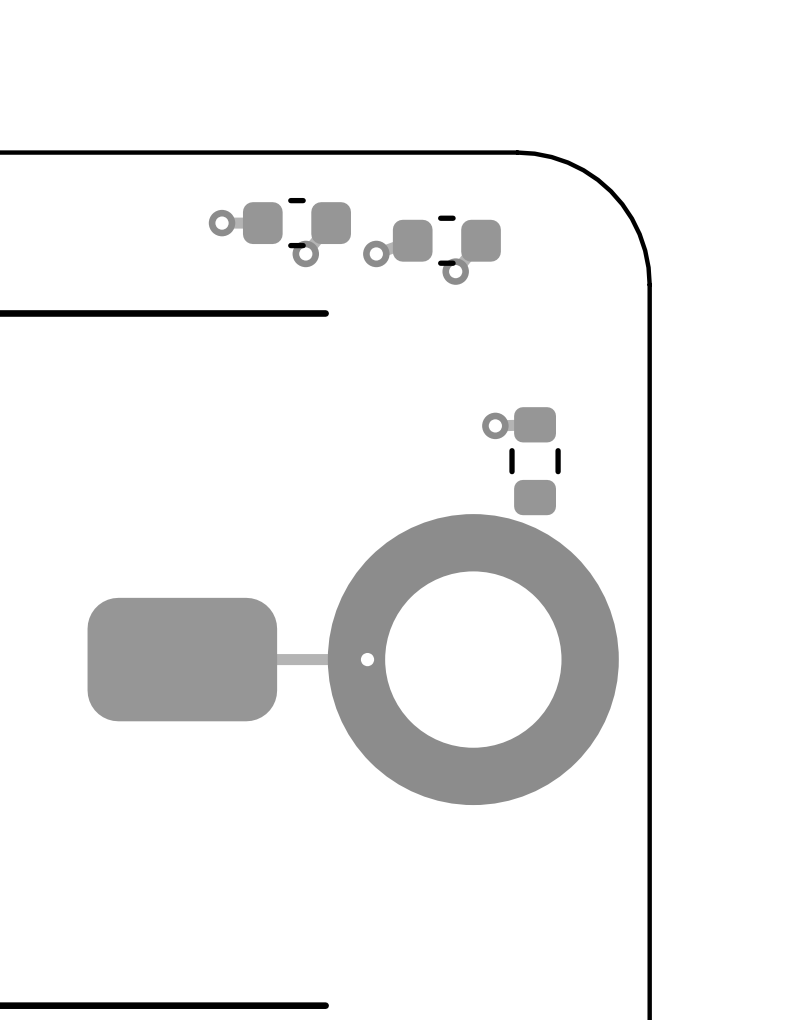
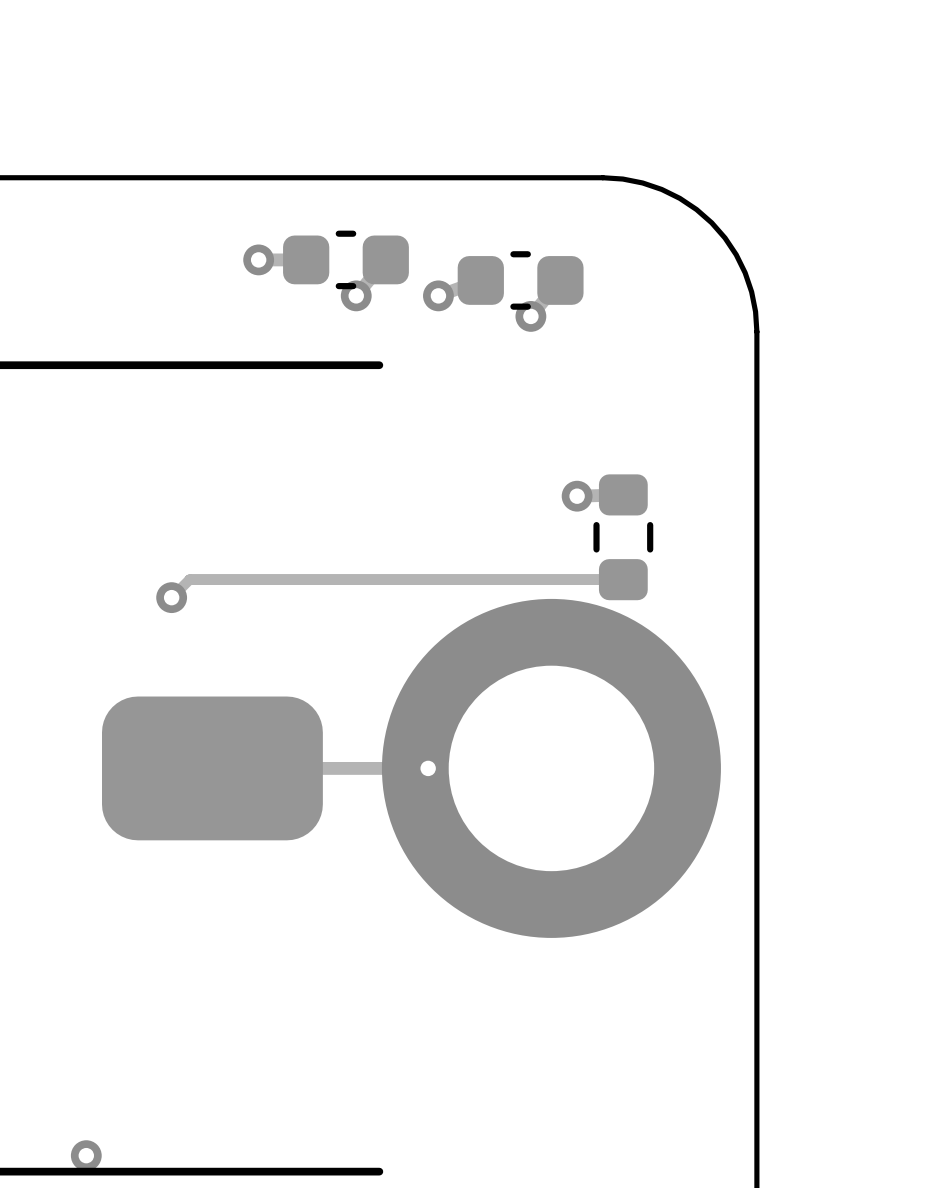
track: none -> (623, 579) (189, 579) (171, 597)
via: none -> (171, 597)
via: none -> (86, 1155)

